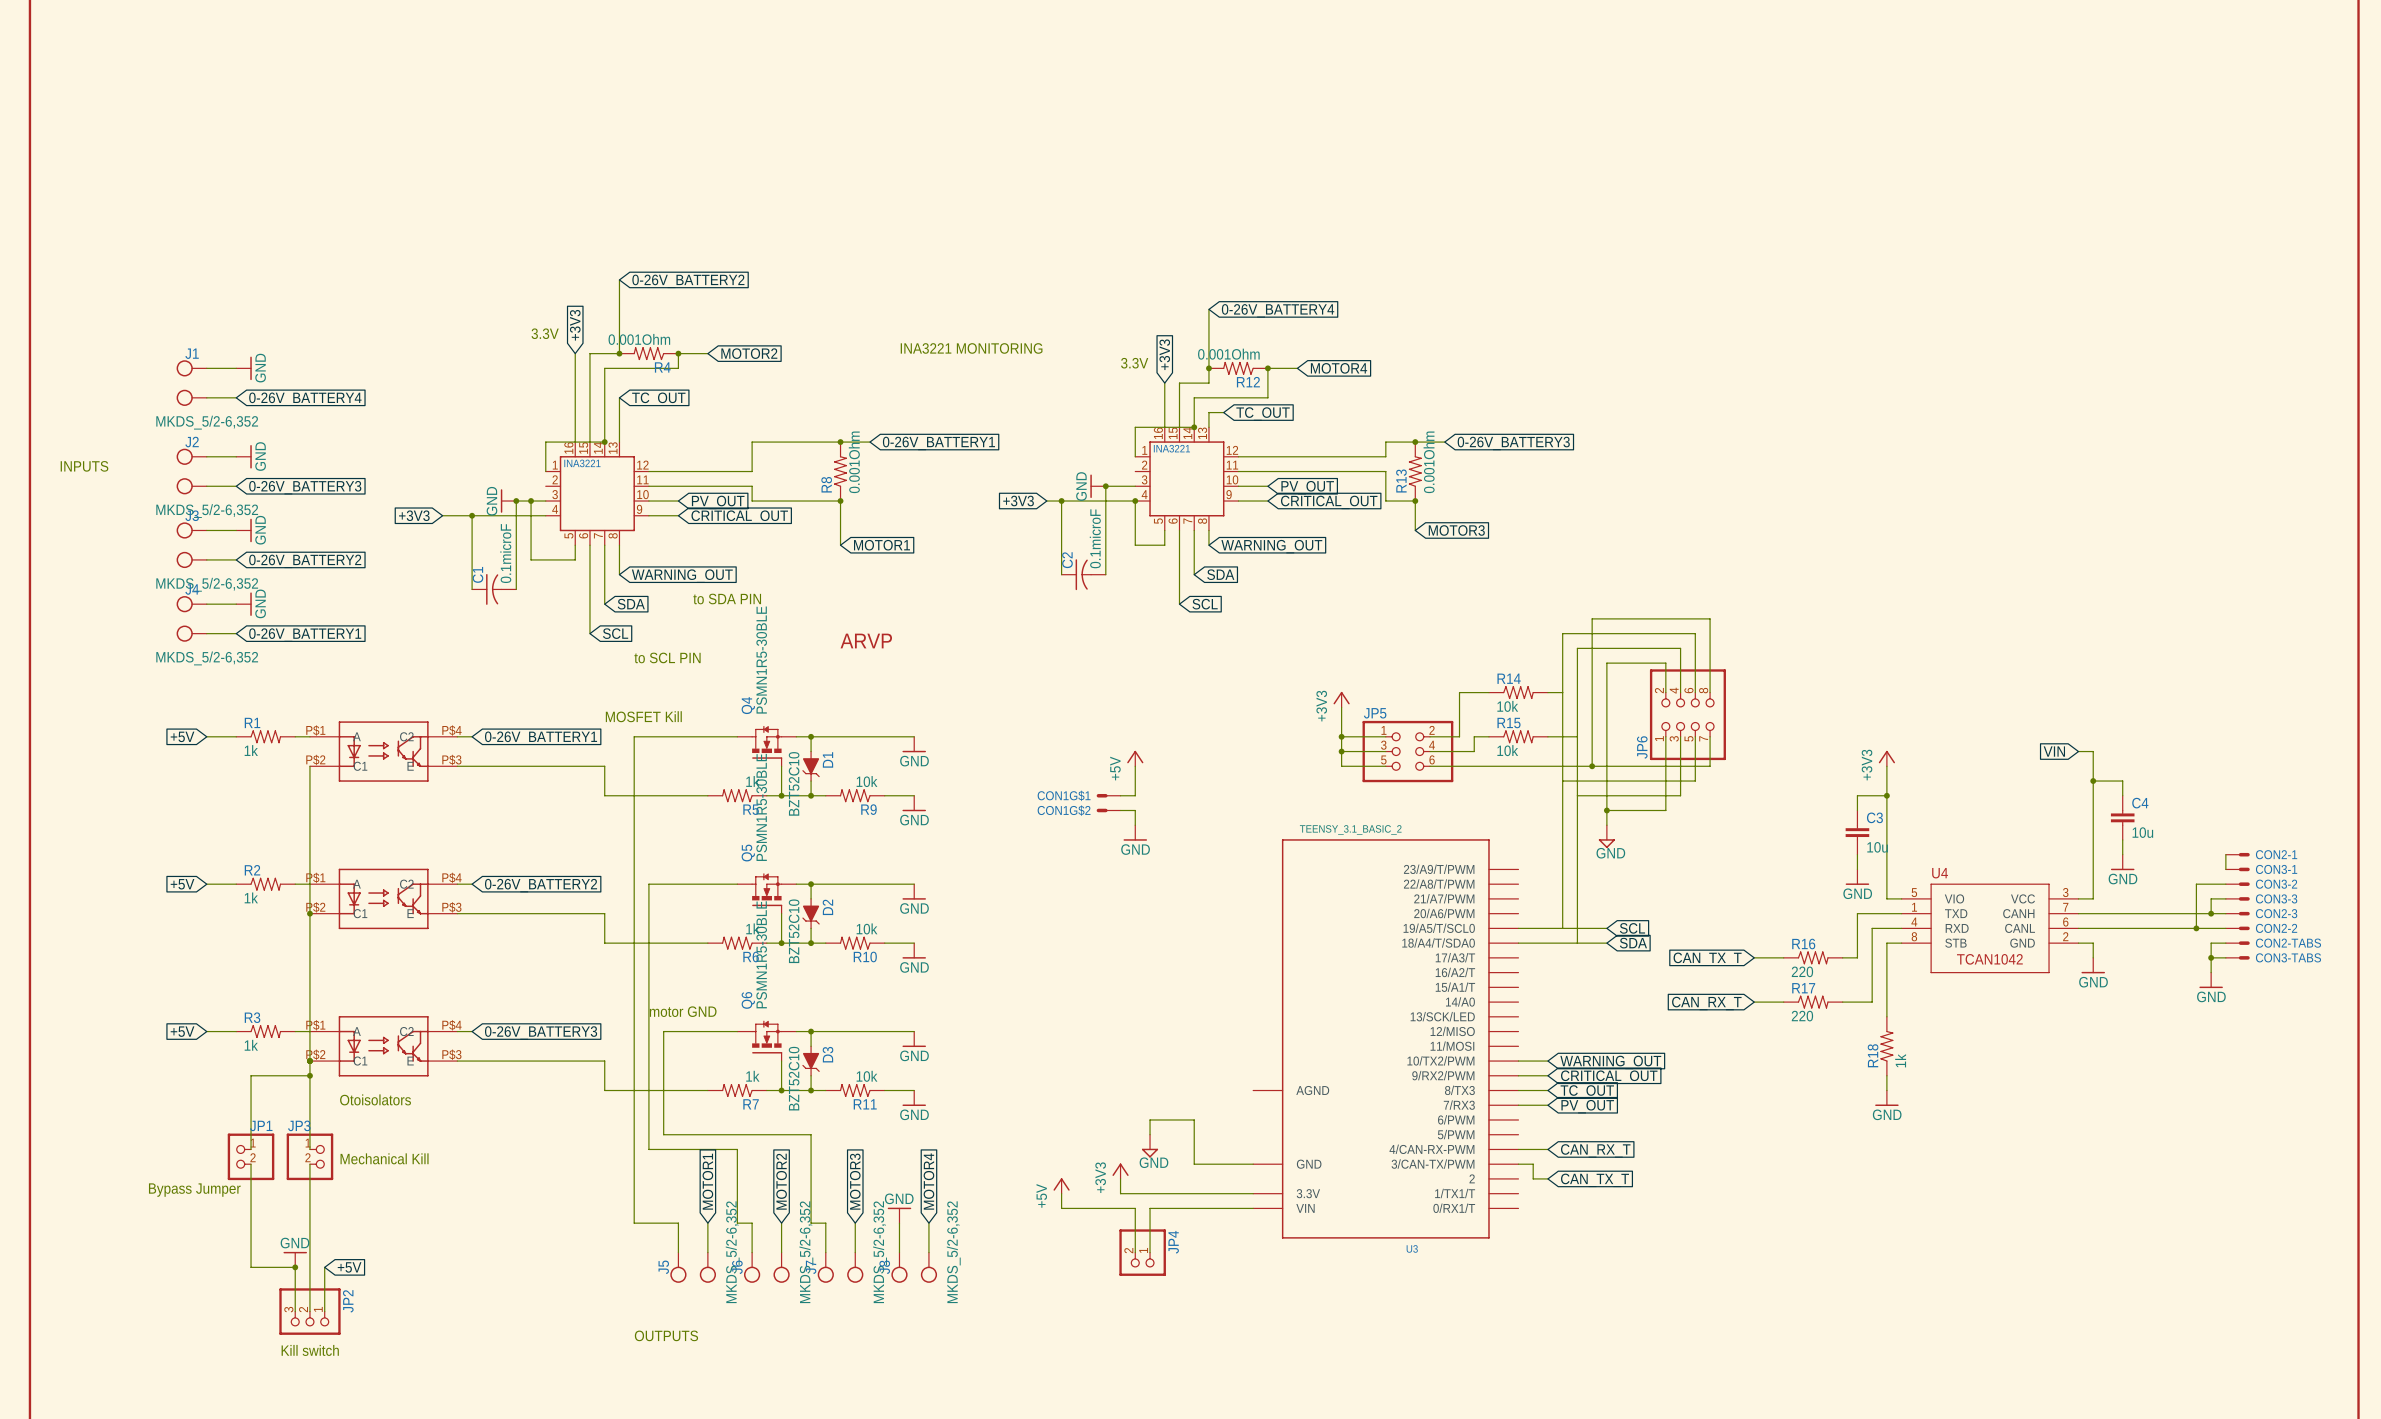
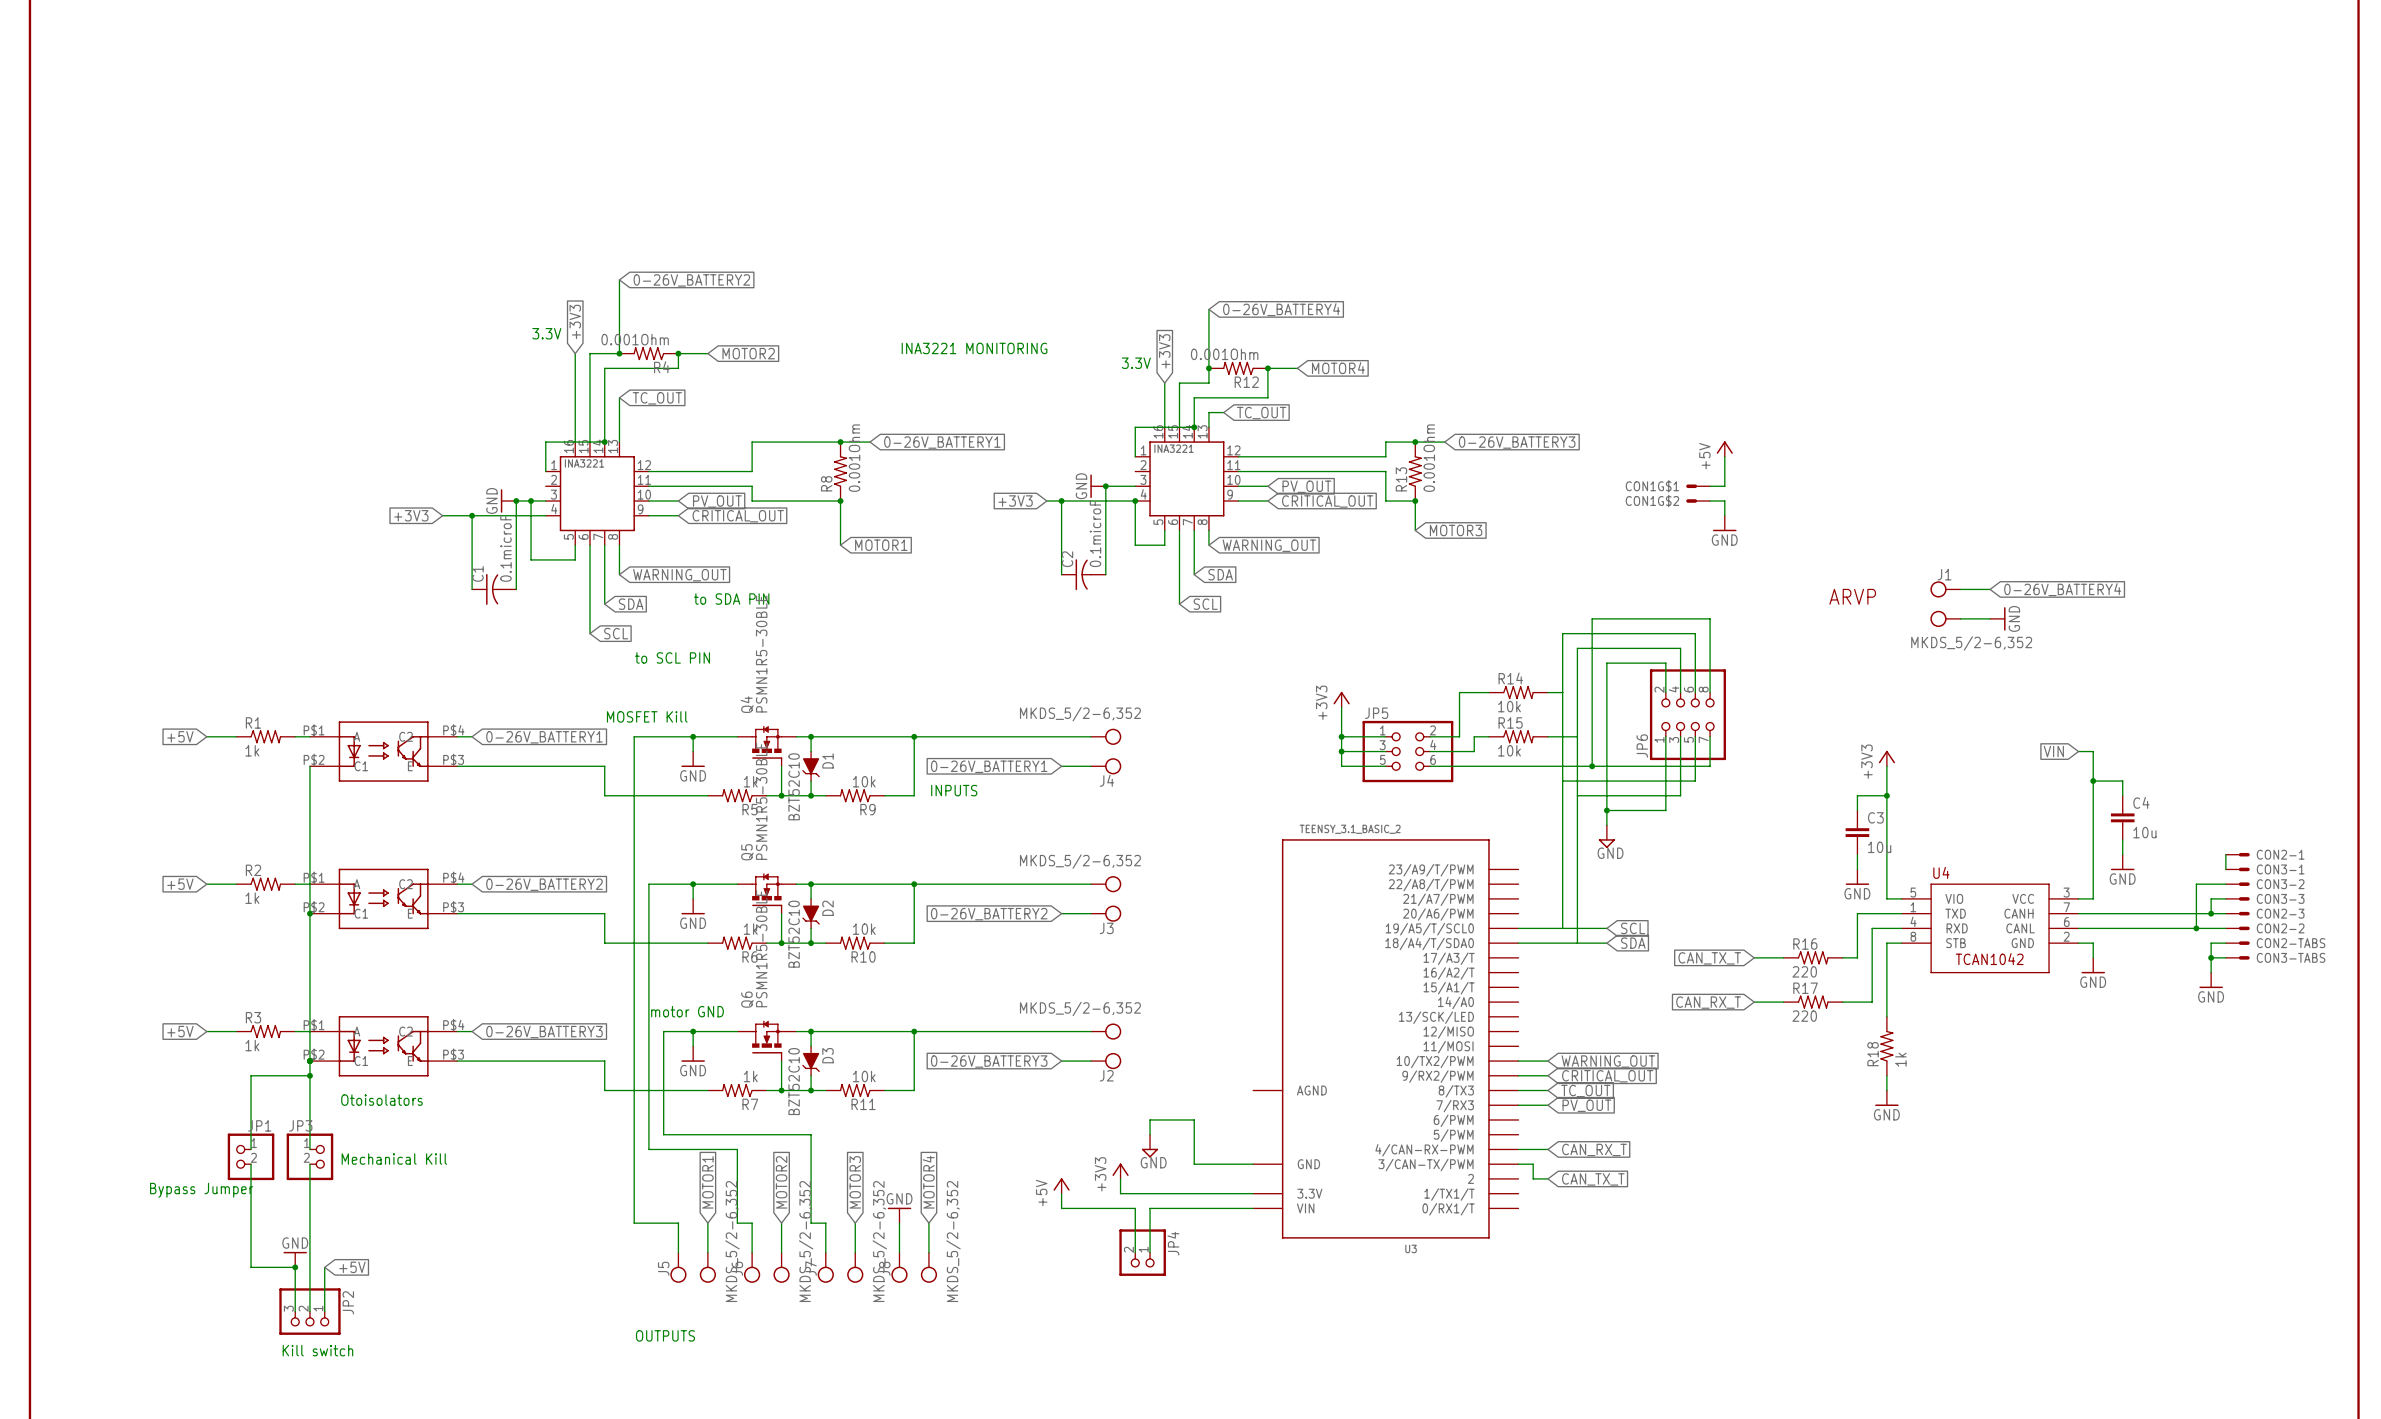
wire: (206, 368) (236, 368) -> none
power symbol: GND (244, 368) -> none
J1 position: (191, 383) -> (1945, 604)
wire: (206, 397) (236, 397) -> none
global label: 0-26V_BATTERY4 (305, 399) -> none
power symbol: none -> +5V (1724, 449)
wire: (206, 456) (236, 456) -> none
power symbol: GND (244, 456) -> none
wire: none -> (1724, 456) (1724, 486) (1710, 486)
text: INPUTS (84, 466) -> none
J2 rotation: 0° (184, 471) -> 180° (1113, 1046)
J2 position: (191, 471) -> (1106, 1046)
wire: (206, 486) (236, 486) -> none
global label: 0-26V_BATTERY3 (305, 487) -> none
wire: none -> (1710, 501) (1724, 501) (1724, 515)
power symbol: none -> GND (1724, 523)
wire: (206, 530) (236, 530) -> none
power symbol: GND (244, 530) -> none
J3 rotation: 0° (184, 545) -> 180° (1113, 898)
J3 position: (191, 545) -> (1106, 898)
wire: (206, 559) (236, 559) -> none
global label: 0-26V_BATTERY2 (305, 561) -> none
wire: none -> (1960, 589) (1990, 589)
global label: none -> 0-26V_BATTERY4 (2062, 589)
part: none -> (1852, 596)
wire: (206, 604) (236, 604) -> none
power symbol: GND (244, 604) -> none
J4 rotation: 0° (184, 618) -> 180° (1113, 751)
J4 position: (191, 618) -> (1106, 751)
wire: none -> (1960, 618) (1990, 618)
power symbol: none -> GND (1997, 618)
wire: (206, 633) (236, 633) -> none
global label: 0-26V_BATTERY1 (305, 635) -> none
part: (866, 641) -> none
wire: none -> (693, 736) (693, 751)
junction: none -> (693, 736)
junction: none -> (914, 736)
wire: none -> (1091, 736) (914, 736) (914, 795)
power symbol: GND (914, 744) -> none
power symbol: +5V (1135, 758) -> none
power symbol: none -> GND (693, 759)
wire: none -> (1061, 766) (1091, 766)
wire: (1135, 766) (1135, 795) (1120, 795) -> none
global label: none -> 0-26V_BATTERY1 (989, 766)
text: none -> INPUTS (954, 790)
CON1G$1 position: (1108, 795) -> (1698, 486)
power symbol: GND (914, 803) -> none
CON1G$2 position: (1108, 810) -> (1698, 501)
wire: (1120, 810) (1135, 810) (1135, 825) -> none
power symbol: GND (1135, 832) -> none
wire: none -> (693, 884) (693, 898)
junction: none -> (693, 884)
junction: none -> (914, 884)
wire: none -> (1091, 884) (914, 884) (914, 943)
power symbol: GND (914, 891) -> none
power symbol: none -> GND (693, 906)
wire: none -> (1061, 913) (1091, 913)
global label: none -> 0-26V_BATTERY2 (989, 914)
power symbol: GND (914, 950) -> none
wire: none -> (693, 1031) (693, 1046)
junction: none -> (693, 1031)
junction: none -> (914, 1031)
wire: none -> (1091, 1031) (914, 1031) (914, 1090)
power symbol: GND (914, 1039) -> none
power symbol: none -> GND (693, 1054)
wire: none -> (1061, 1061) (1091, 1061)
global label: none -> 0-26V_BATTERY3 (989, 1061)
power symbol: GND (914, 1098) -> none

